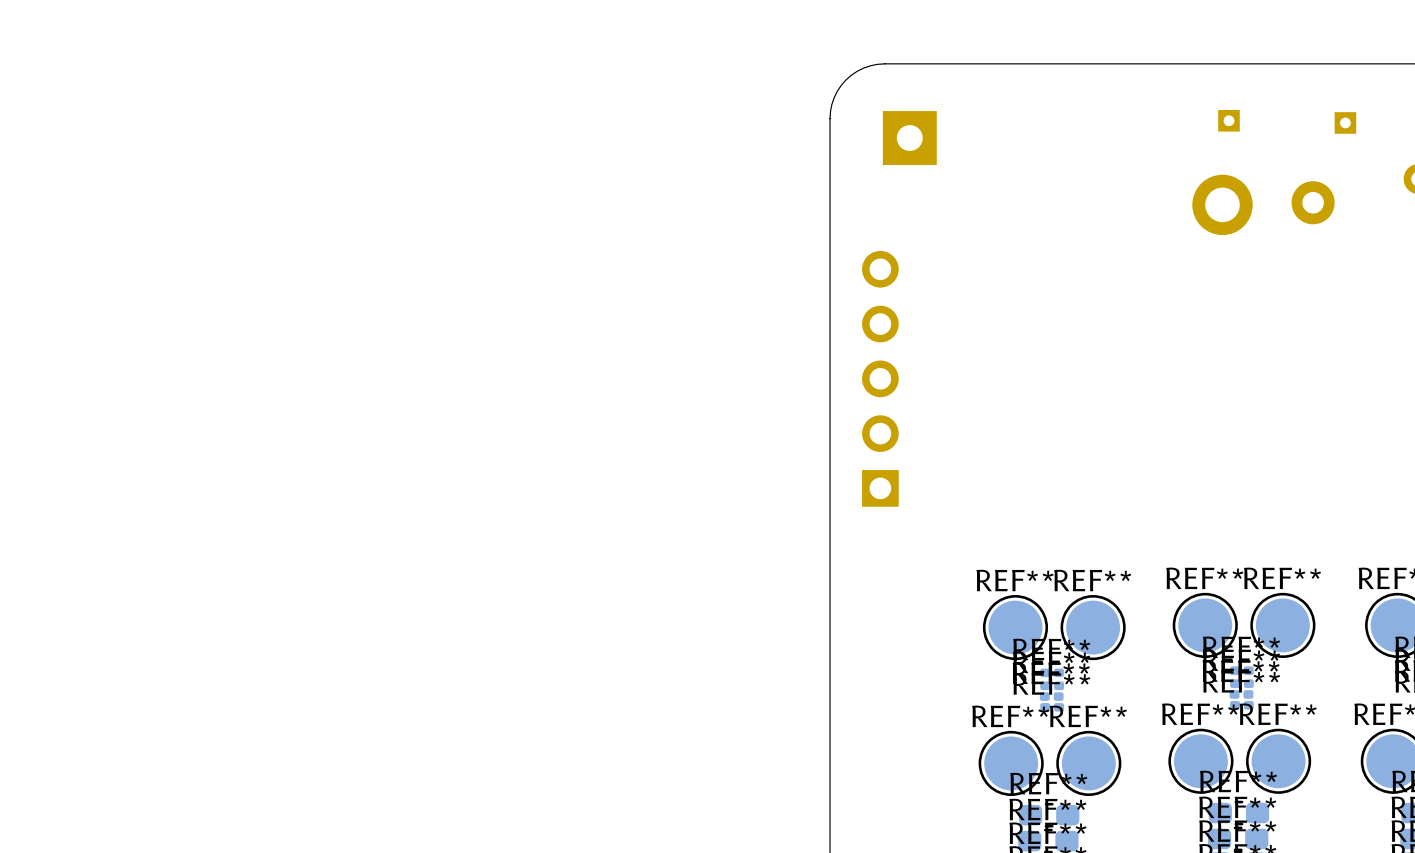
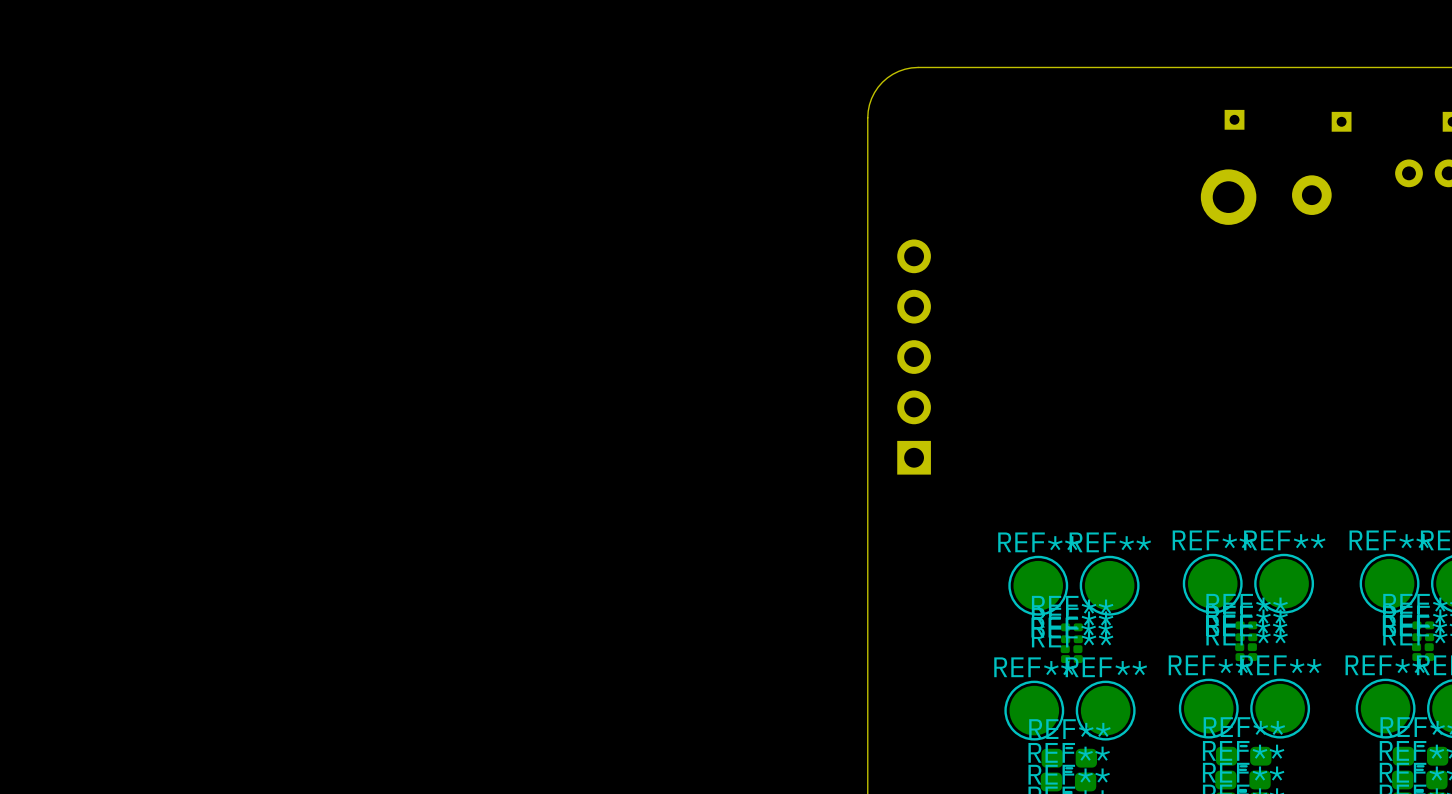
part: (909, 138) -> none

